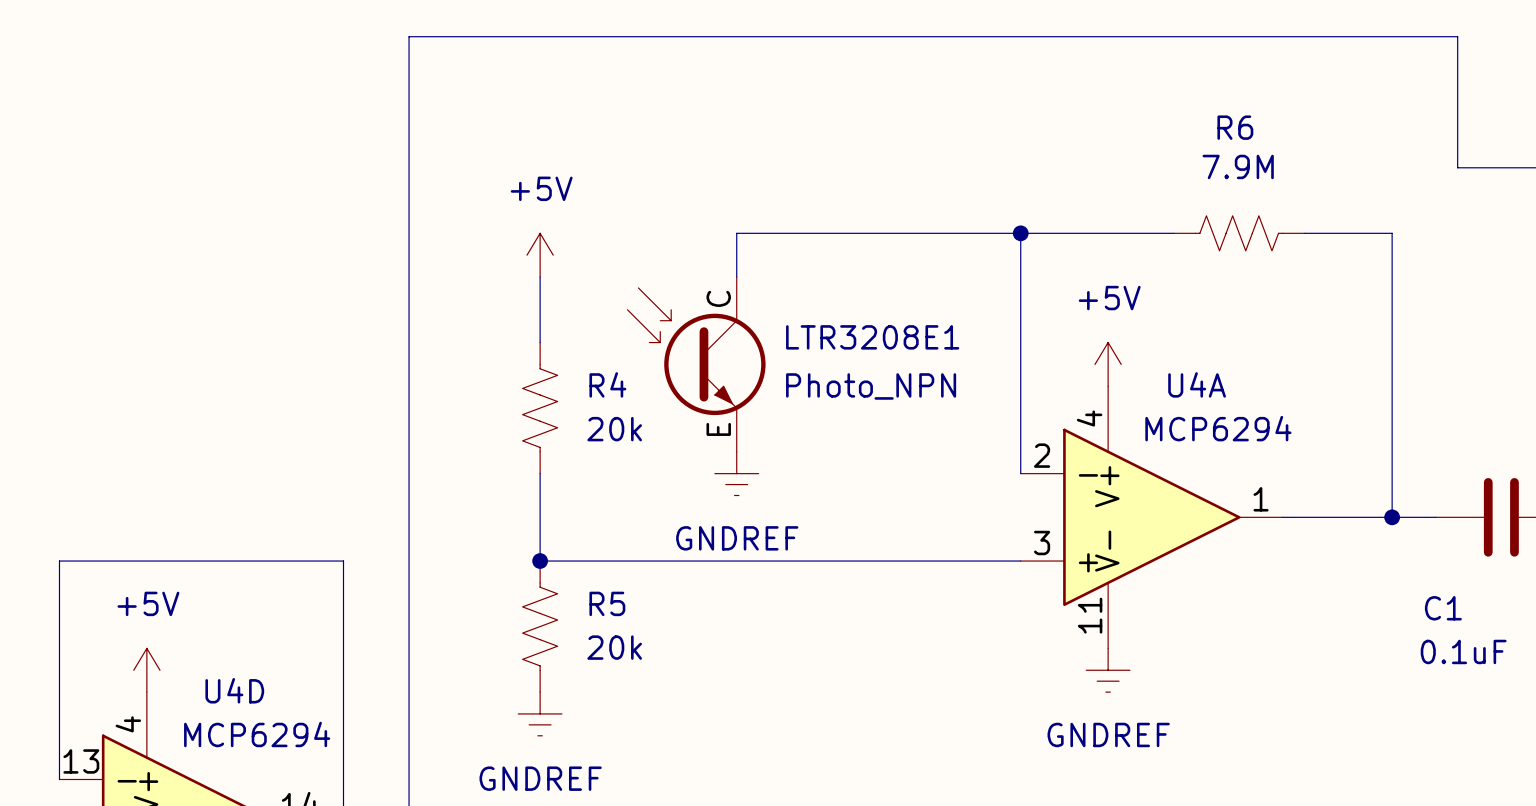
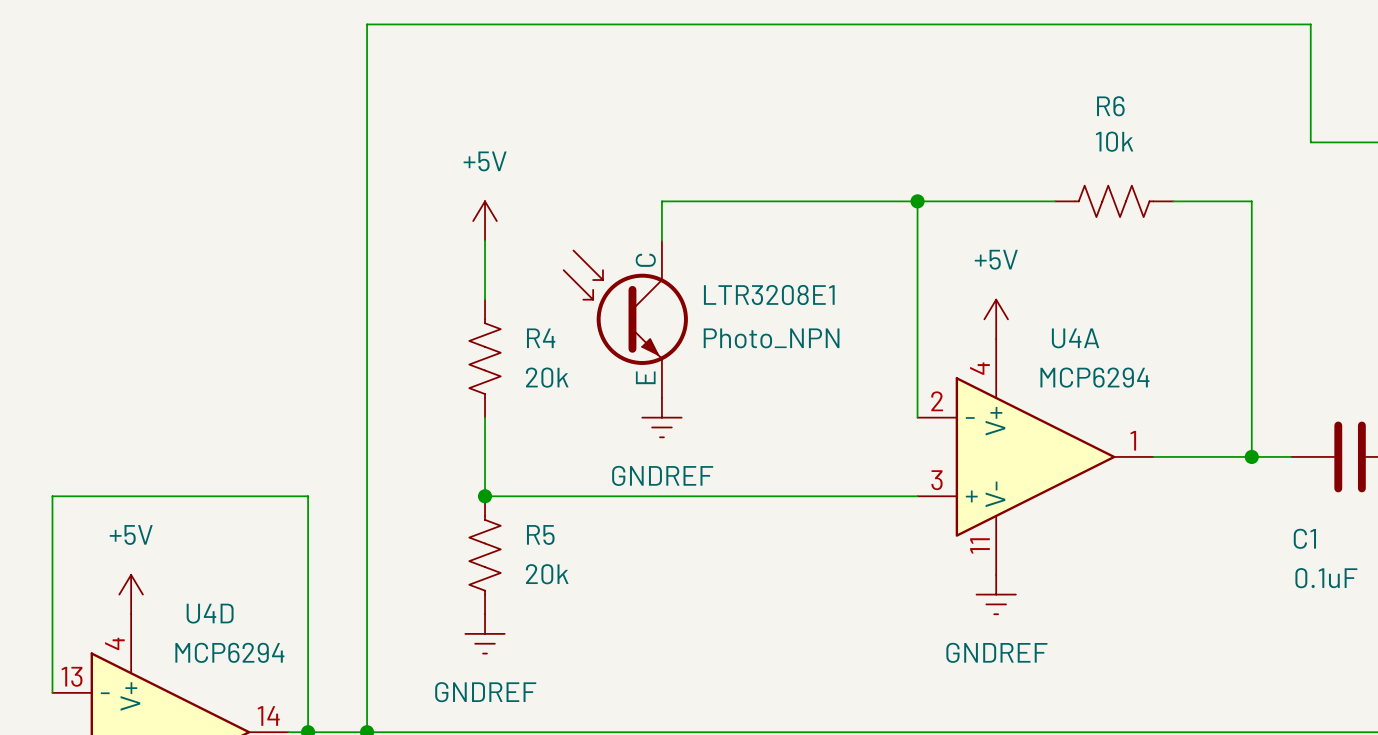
R6 value: 7.9M (1238, 166) -> 10k (1114, 141)

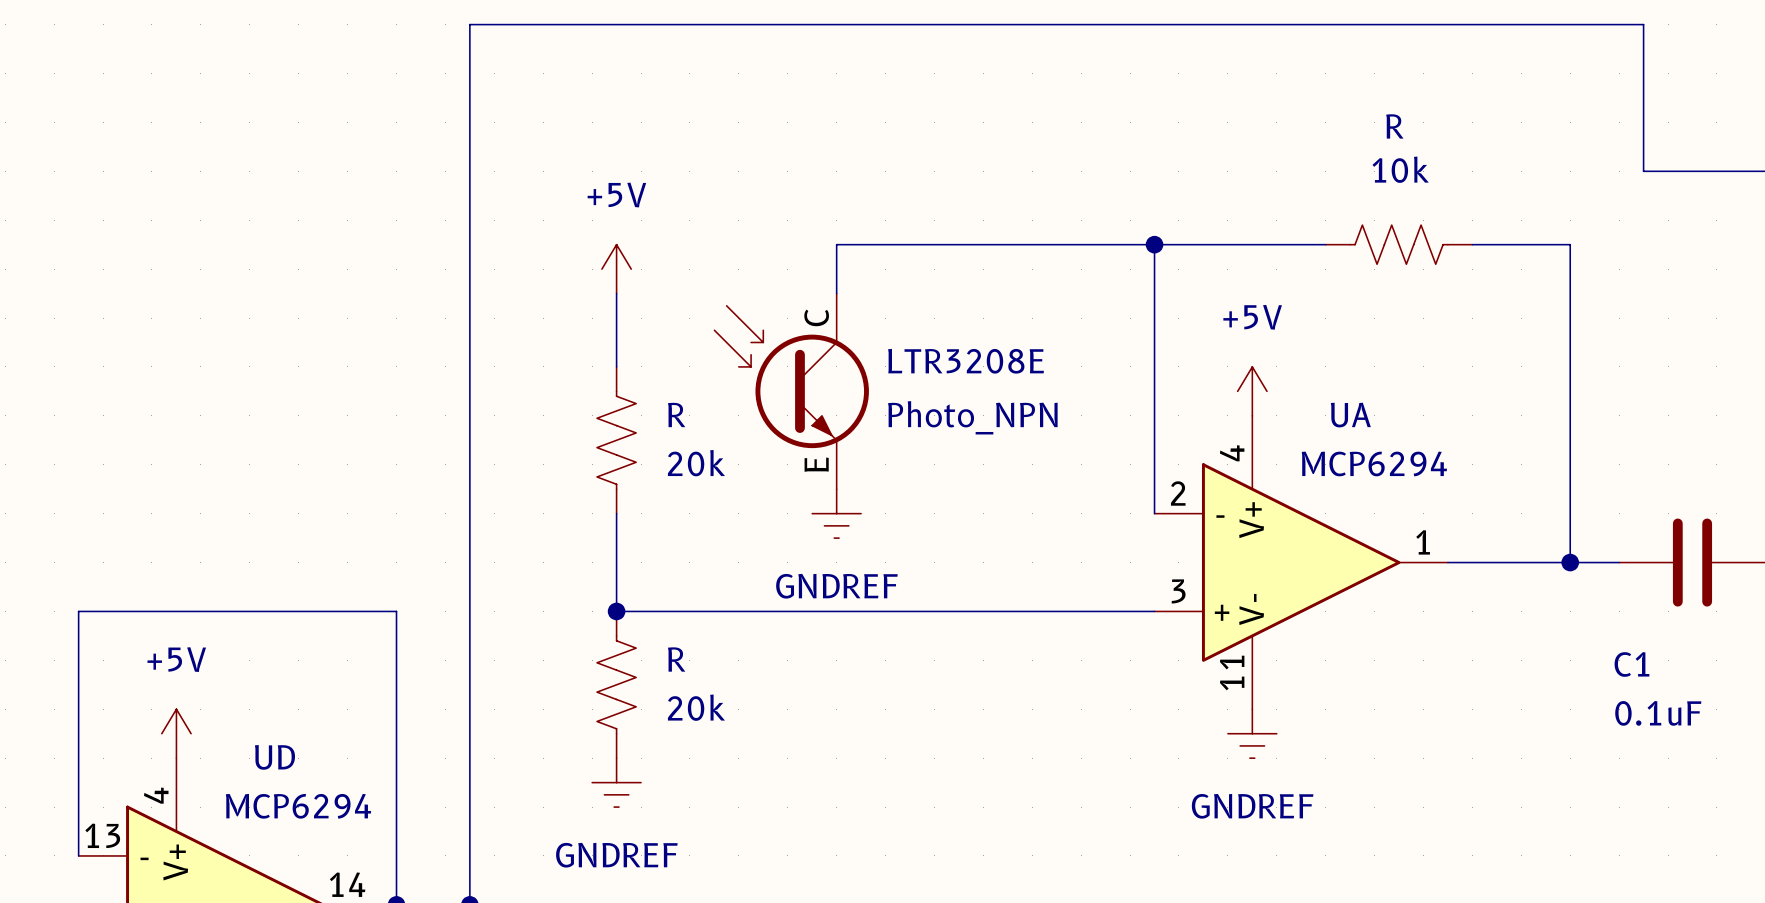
R6 name: R6 (1110, 106) -> R (1394, 126)
LTR3208E1 name: LTR3208E1 (769, 295) -> LTR3208E (966, 361)
R4 name: R4 (541, 338) -> R (676, 414)
U4A name: U4A (1075, 338) -> UA (1350, 415)
R5 name: R5 (540, 534) -> R (676, 659)
U4D name: U4D (210, 613) -> UD (274, 757)

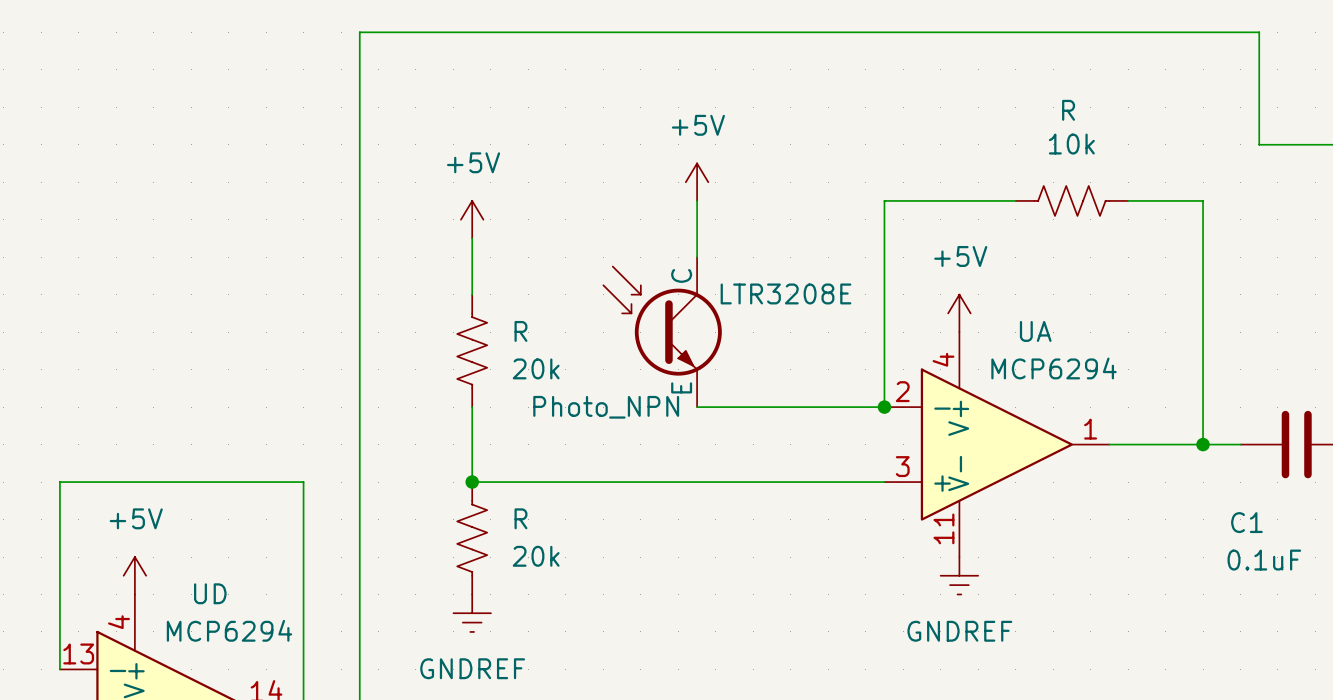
power symbol: none -> +5V (697, 182)
wire: none -> (697, 200) (697, 257)
wire: (1154, 244) (836, 244) (836, 293) -> none
junction: (1154, 244) -> none
LTR3208E name position: LTR3208E (966, 361) -> LTR3208E (785, 293)
LTR3208E position: (791, 391) -> (662, 332)
LTR3208E value position: Photo_NPN (972, 417) -> Photo_NPN (606, 407)
power symbol: GNDREF (836, 513) -> none
wire: none -> (697, 407) (884, 407)
junction: none -> (884, 407)

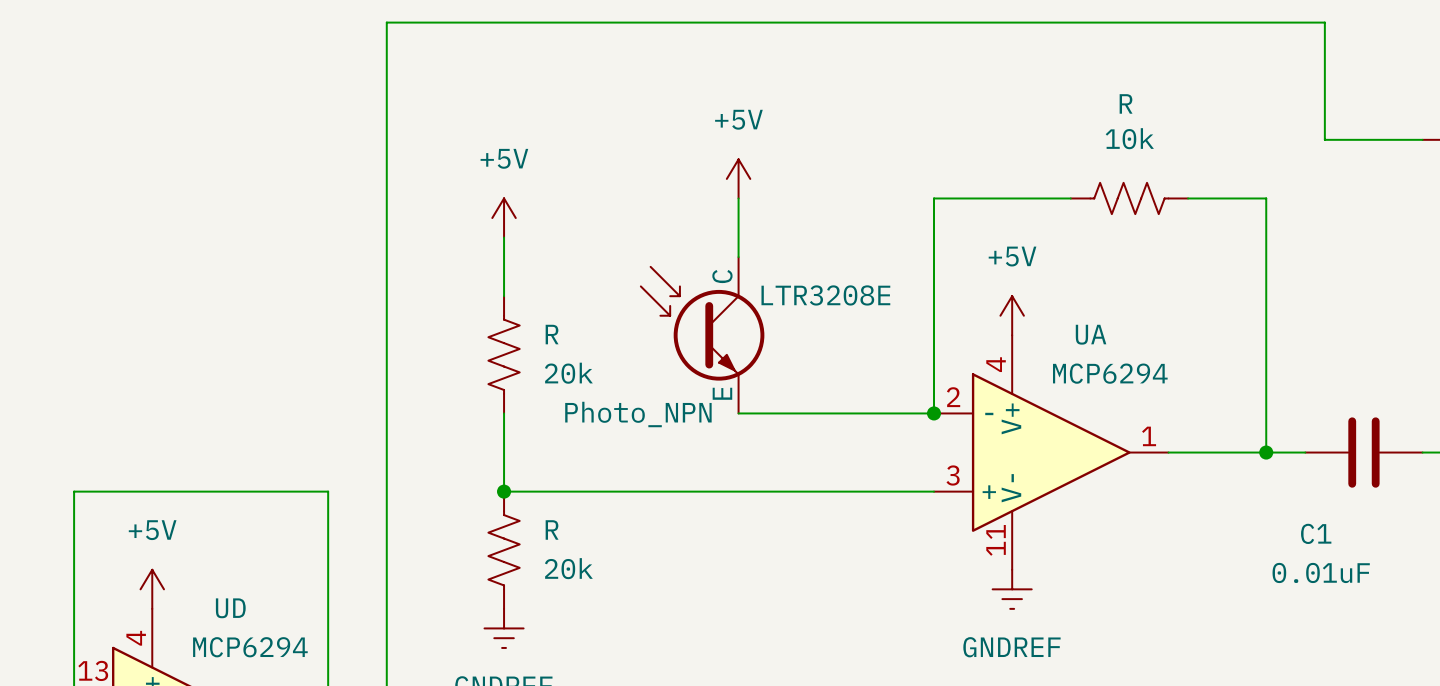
C1 value: 0.1uF (1264, 560) -> 0.01uF (1321, 572)

